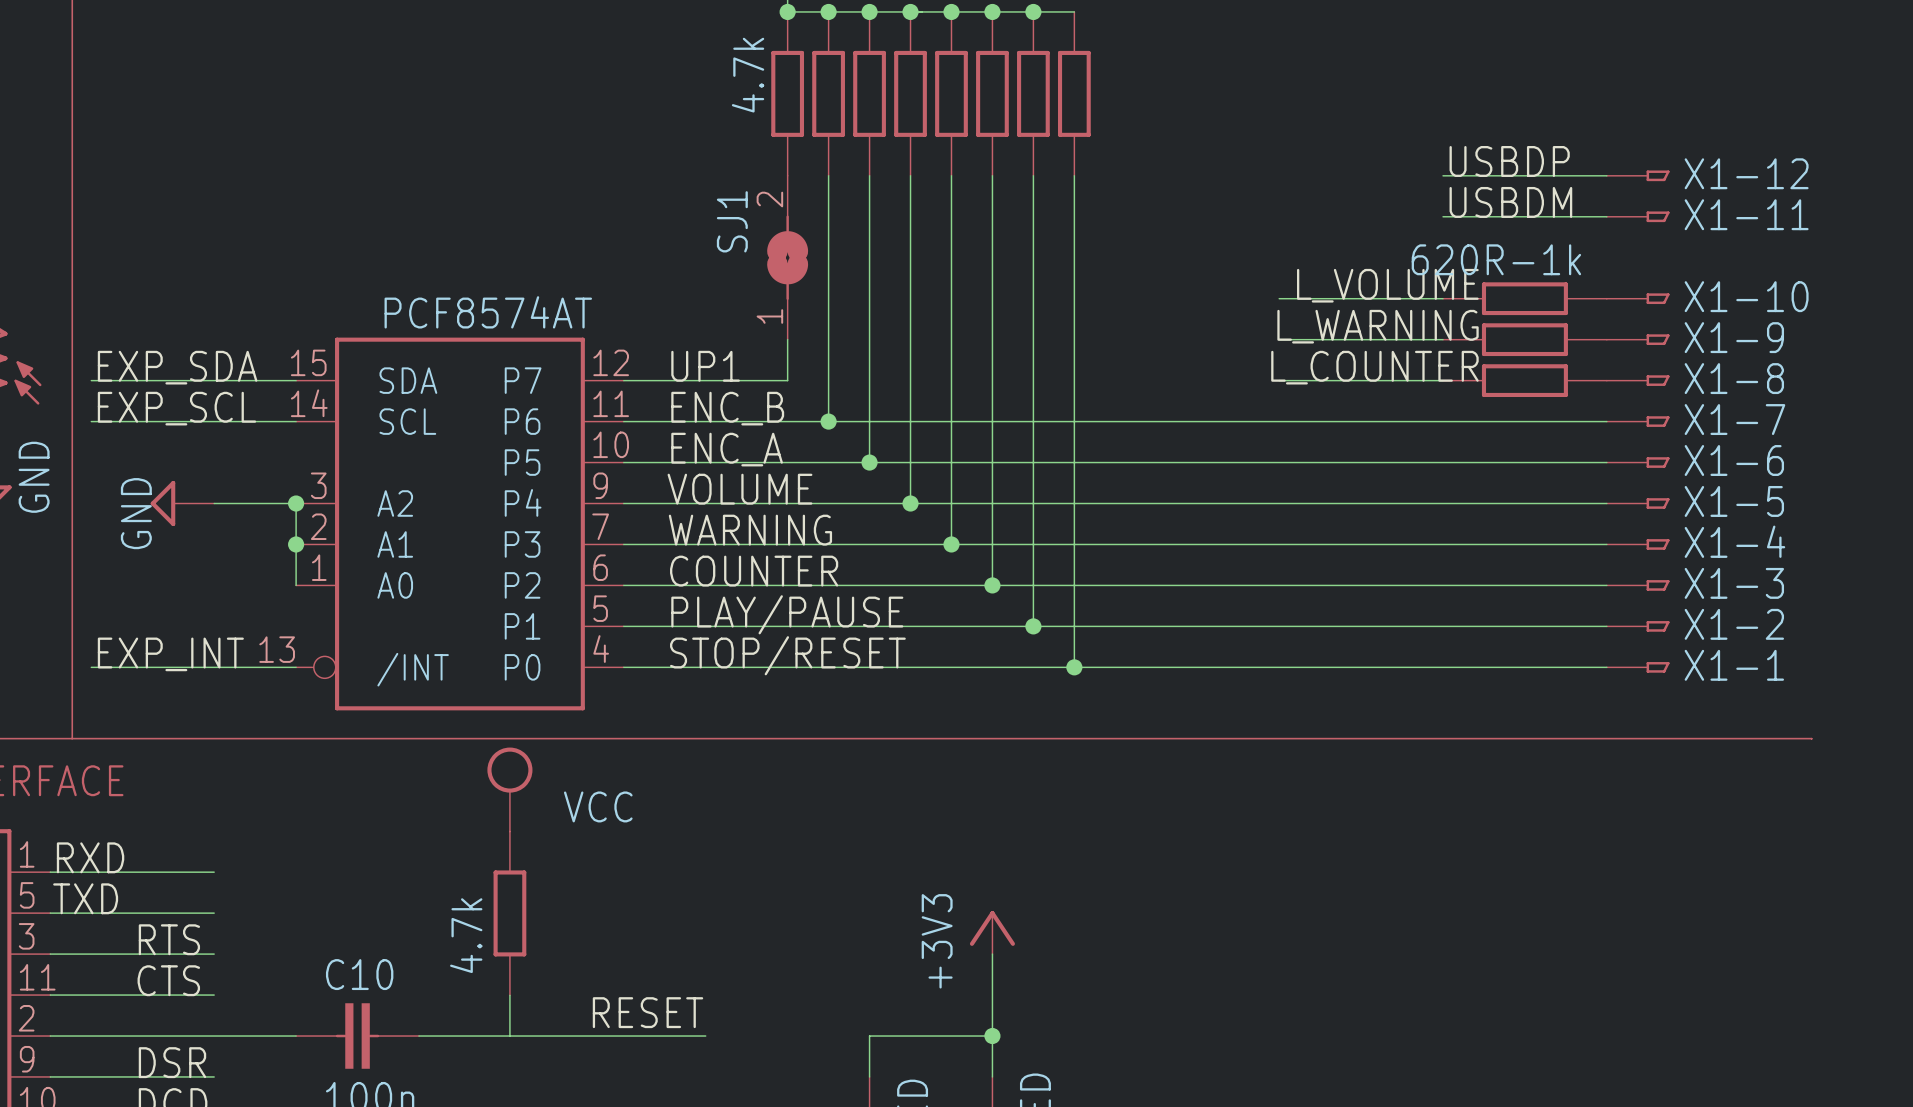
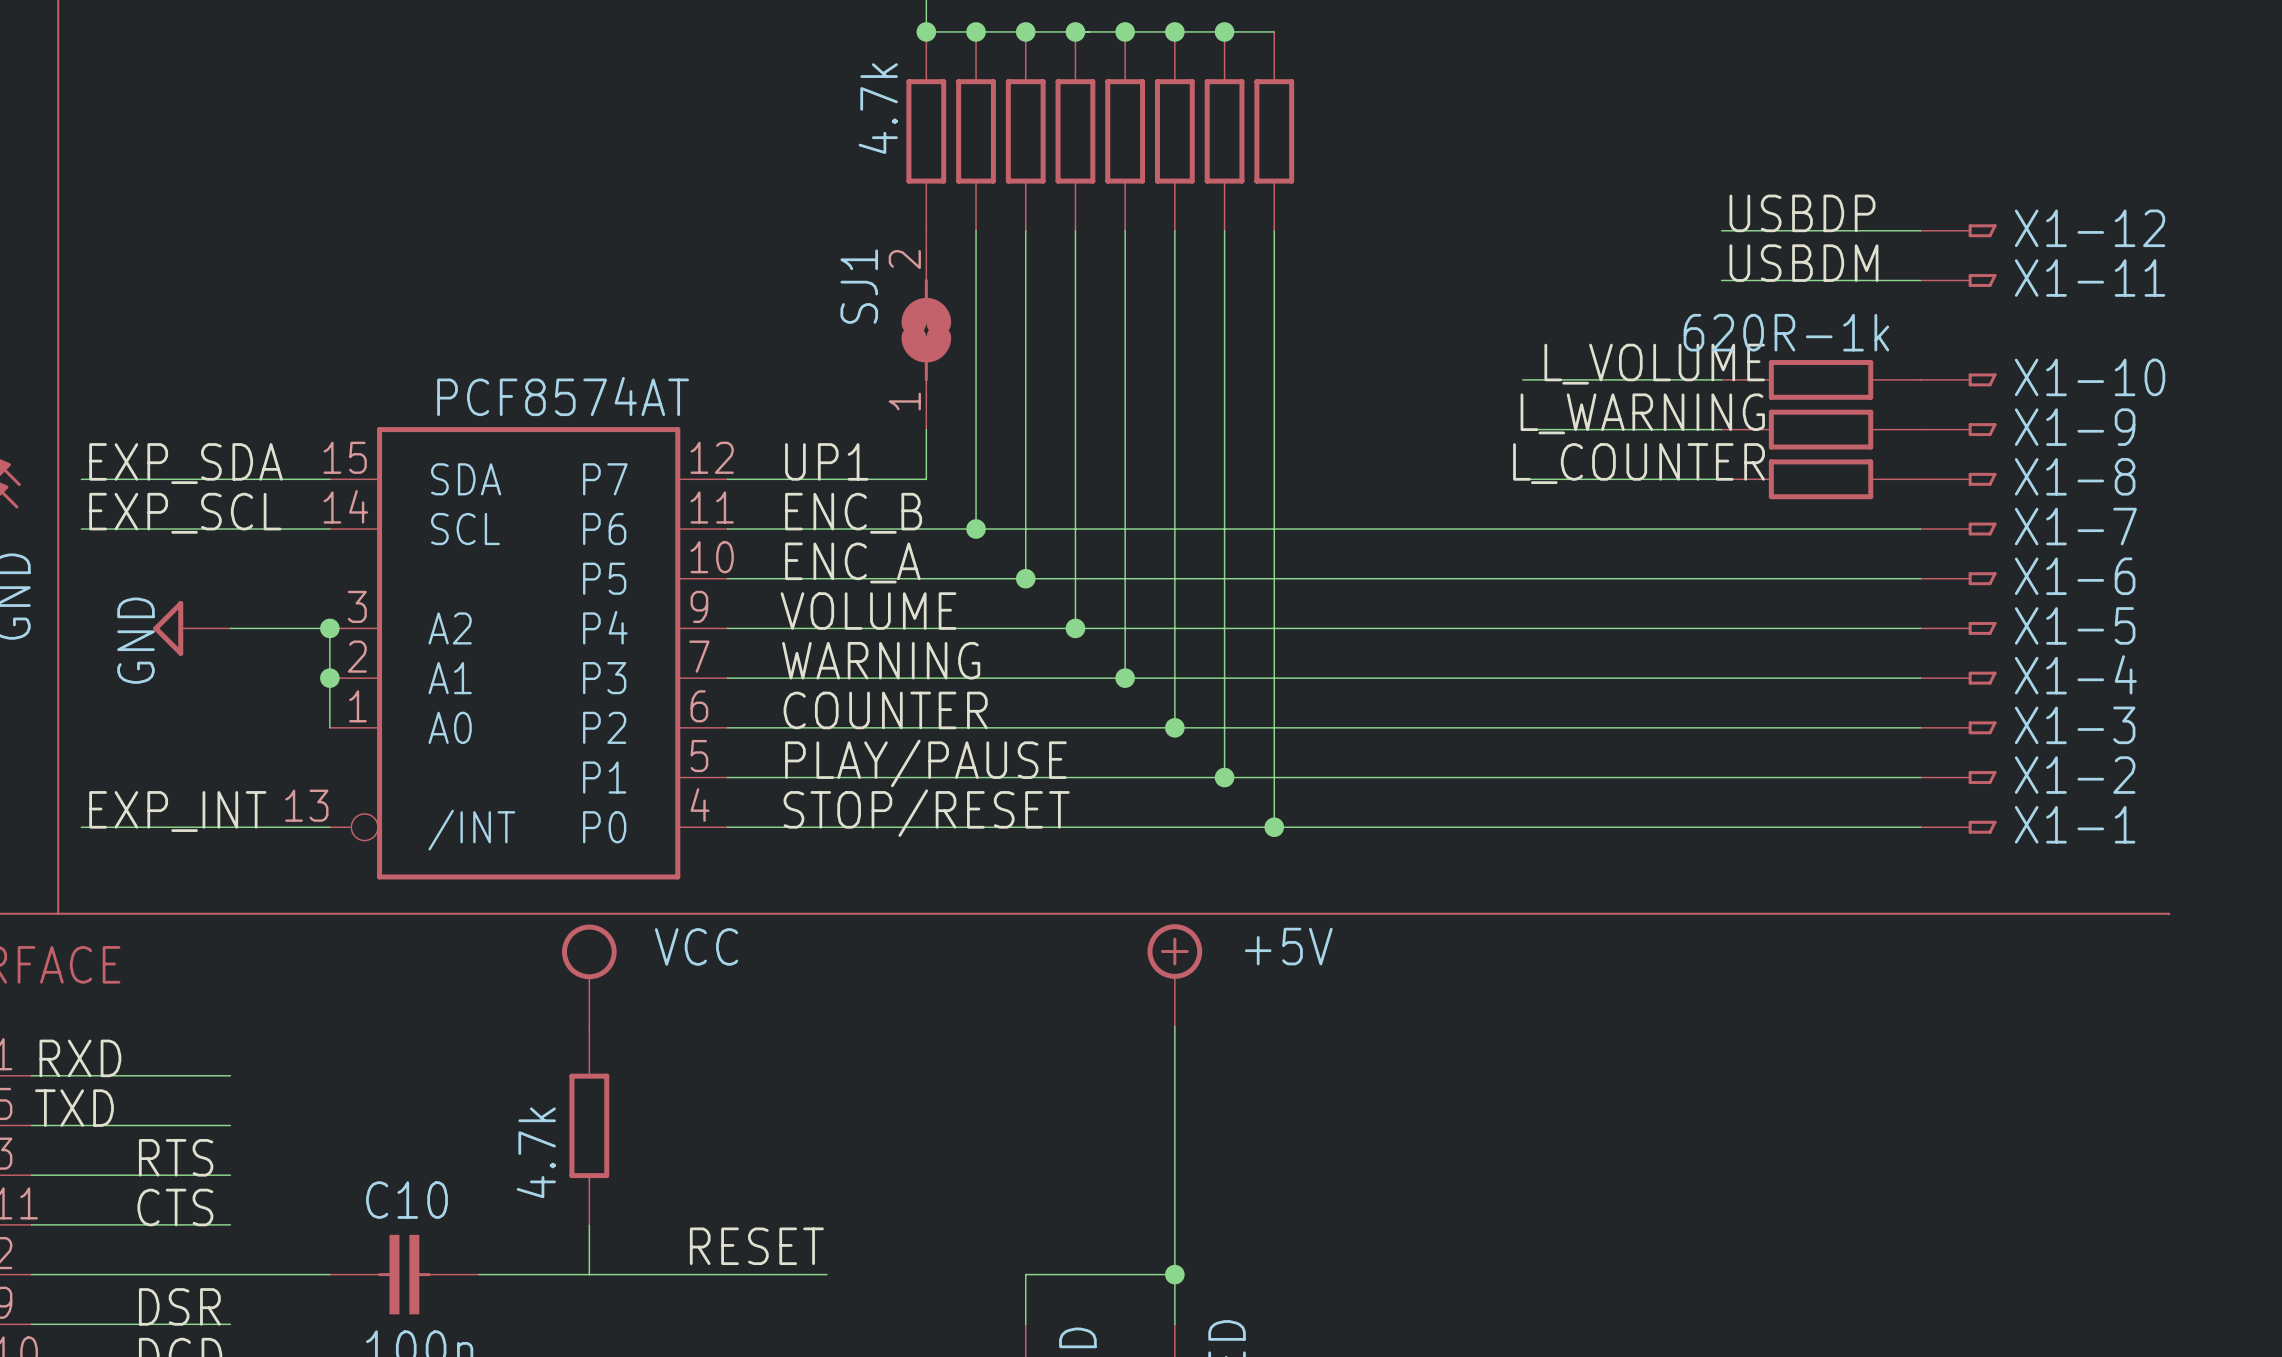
power symbol: none -> +5V (1174, 975)
power symbol text position: VCC (598, 806) -> VCC (696, 946)
wire: none -> (1174, 1026) (1174, 1175)
power symbol: +3V3 (992, 932) -> none

